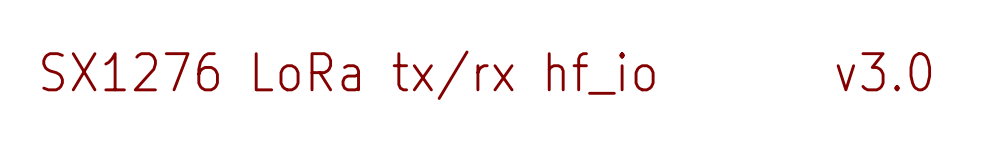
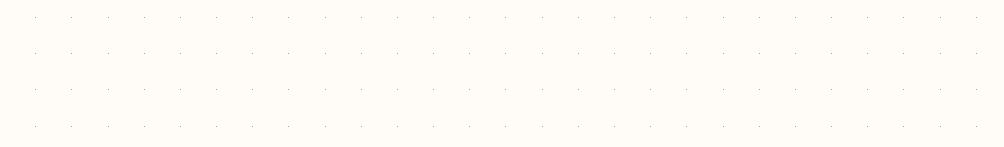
text: v3.0 (883, 71) -> none
text: SX1276 LoRa tx/rx hf_io (348, 75) -> none

